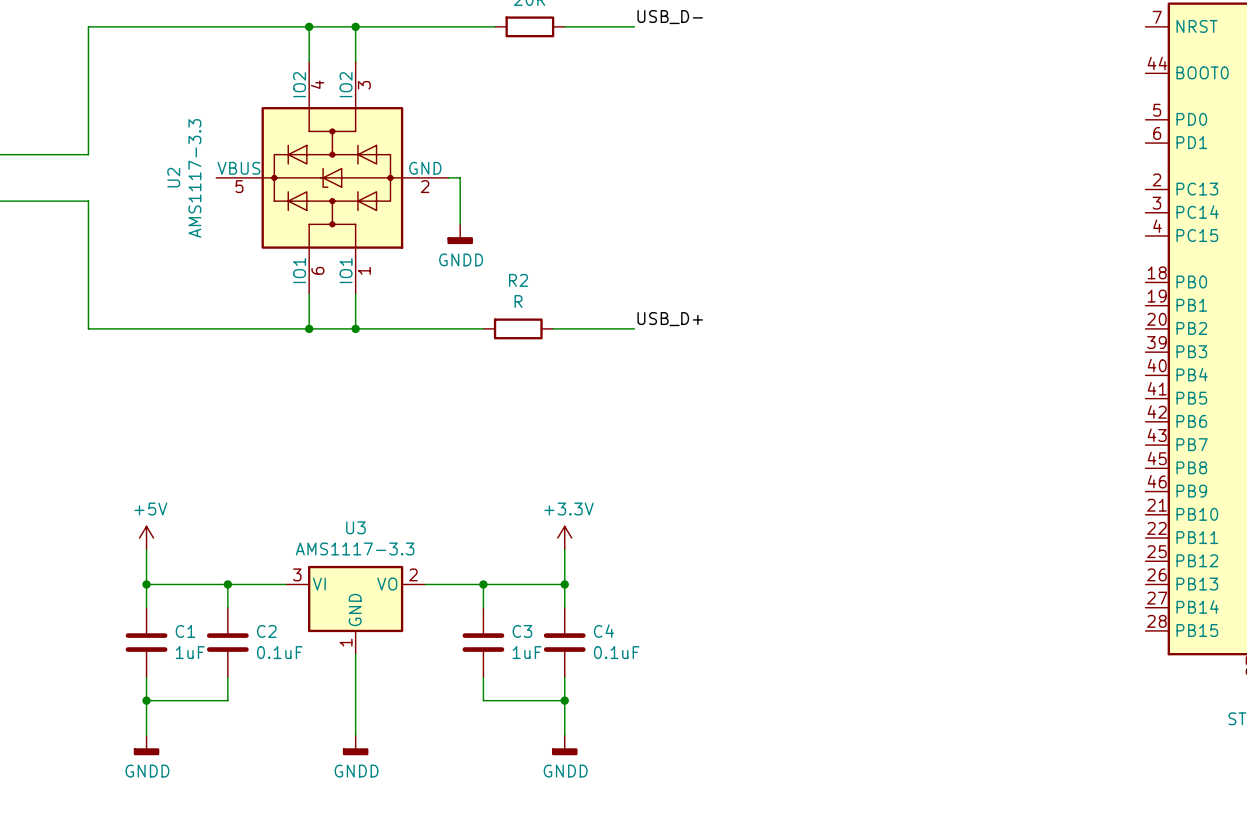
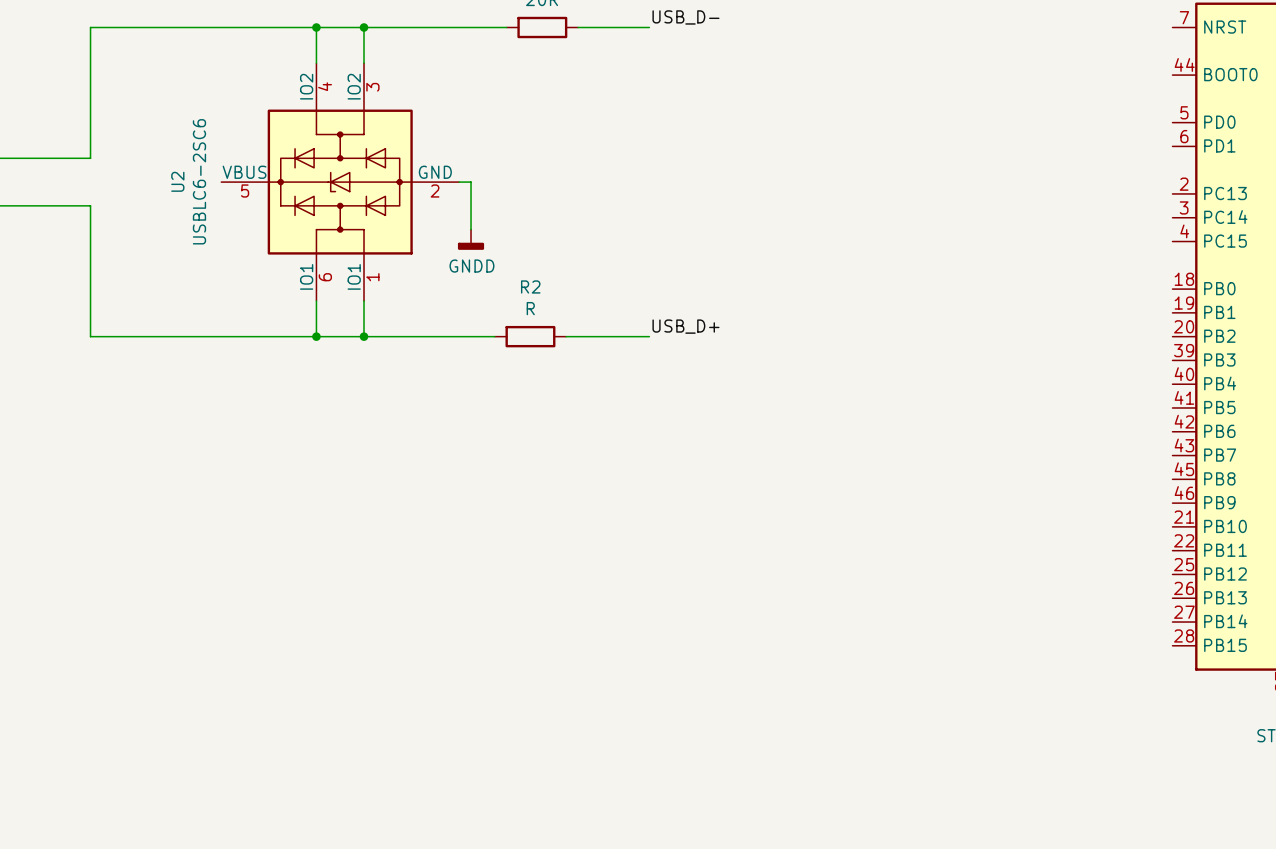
U2 value: AMS1117-3.3 (194, 178) -> USBLC6-2SC6 (199, 181)
power symbol: +5V (146, 538) -> none
power symbol: +3.3V (564, 538) -> none
wire: (146, 549) (146, 607) -> none
wire: (564, 549) (564, 607) -> none
wire: (146, 584) (285, 584) -> none
junction: (146, 584) -> none
wire: (227, 584) (227, 607) -> none
junction: (227, 584) -> none
wire: (425, 584) (564, 584) -> none
wire: (483, 584) (483, 607) -> none
junction: (483, 584) -> none
junction: (564, 584) -> none
U3: AMS1117-3.3 (355, 610) -> none
C1: 1uF (146, 642) -> none
C2: 0.1uF (227, 642) -> none
C3: 1uF (483, 642) -> none
C4: 0.1uF (564, 642) -> none
wire: (355, 654) (355, 735) -> none
wire: (146, 677) (146, 735) -> none
wire: (227, 677) (227, 700) (146, 700) -> none
wire: (483, 677) (483, 700) (564, 700) -> none
wire: (564, 677) (564, 735) -> none
junction: (146, 700) -> none
junction: (564, 700) -> none
power symbol: GNDD (146, 745) -> none
power symbol: GNDD (355, 745) -> none
power symbol: GNDD (564, 745) -> none

